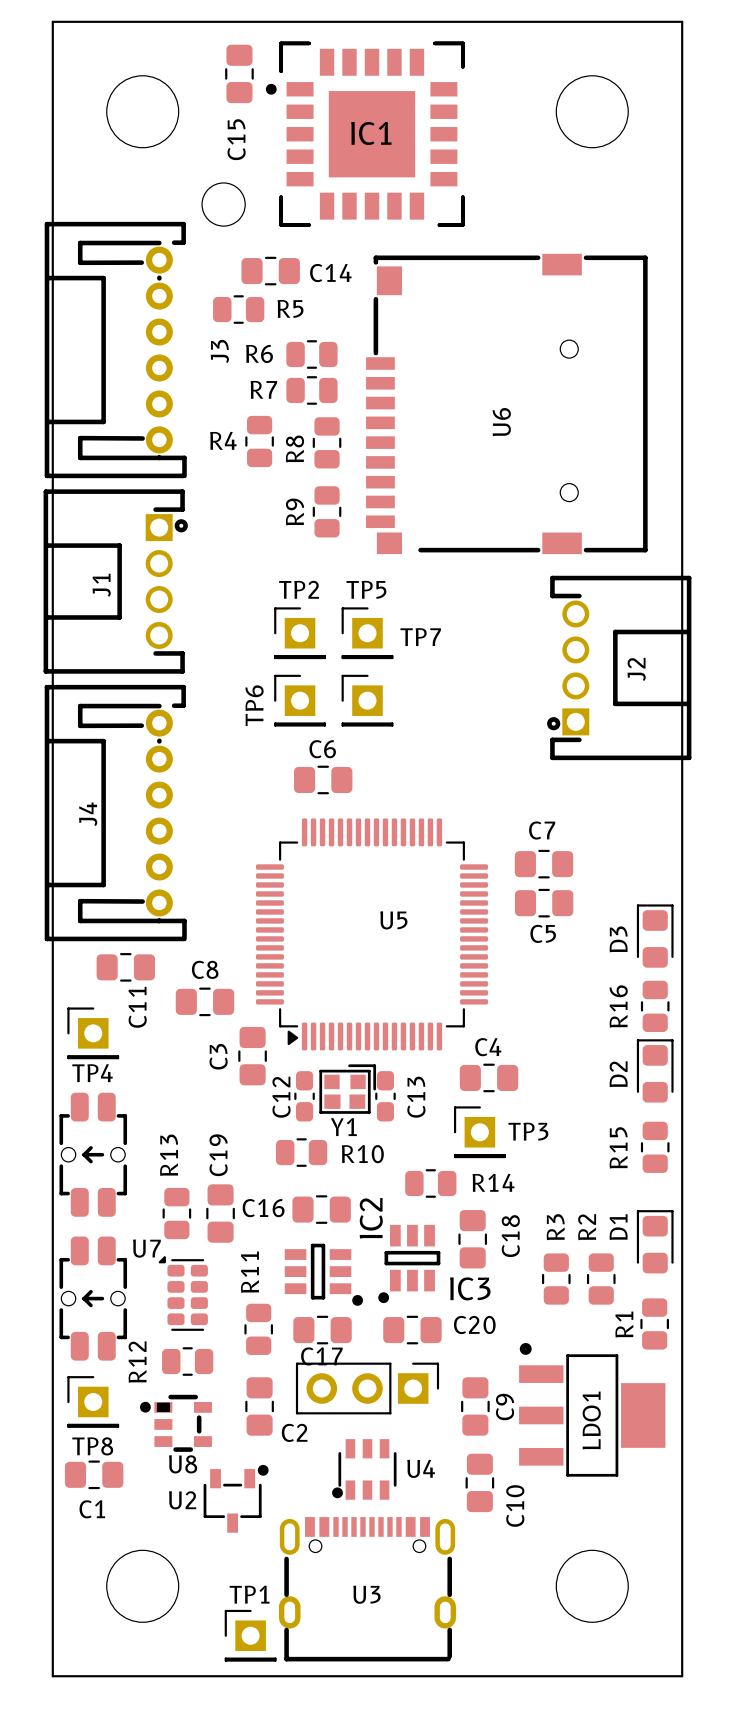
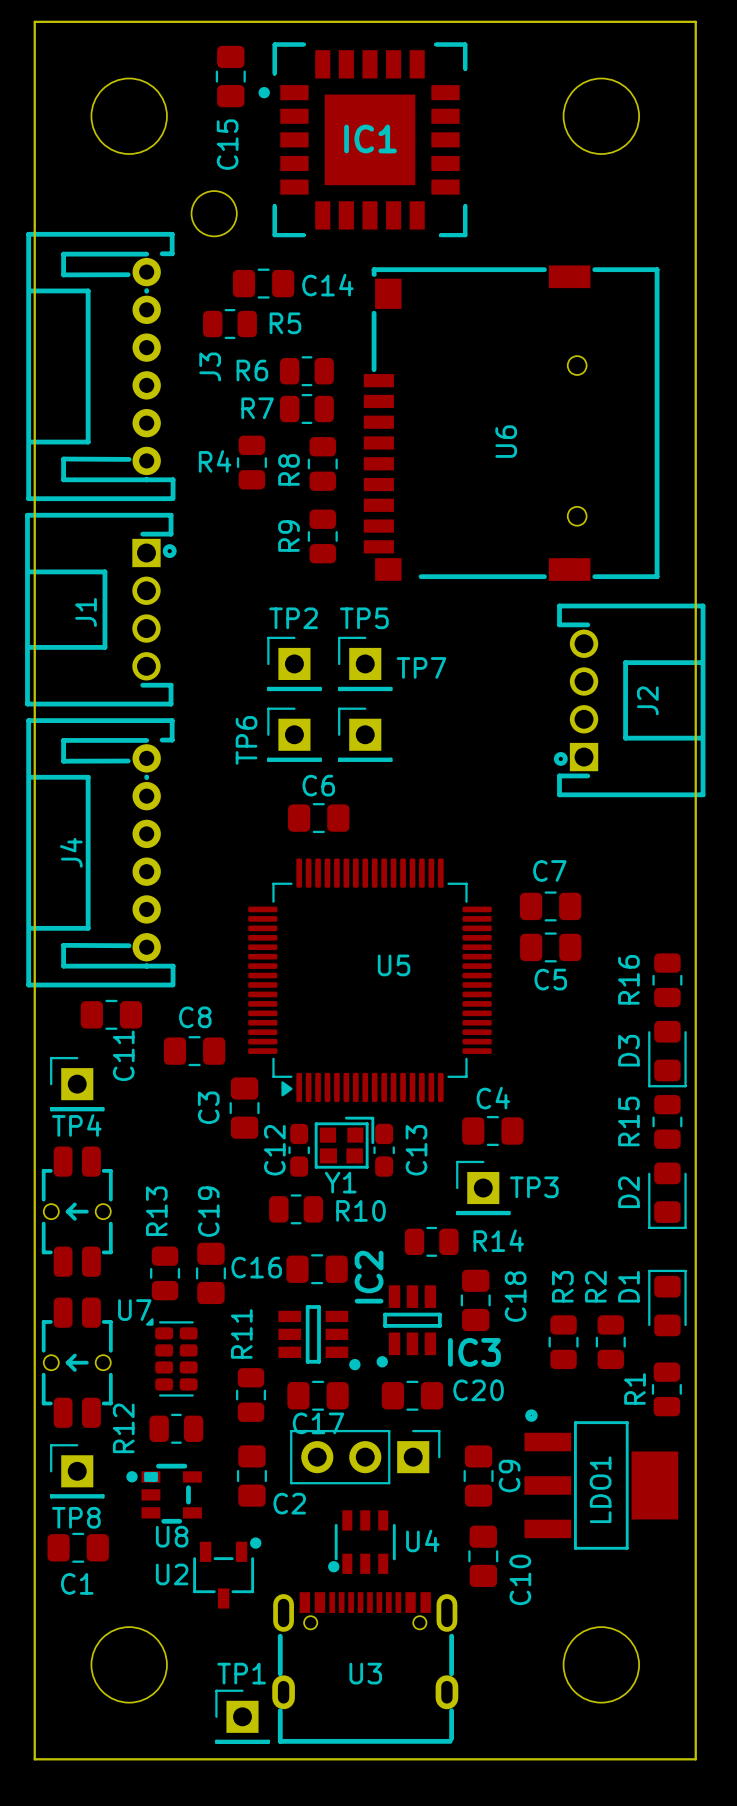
D3 rotation: 0° (655, 936) -> 180° (667, 1054)
D3 position: (655, 936) -> (667, 1054)
R16 position: (655, 1006) -> (667, 980)
D2 rotation: 0° (655, 1070) -> 180° (667, 1195)
D2 position: (655, 1070) -> (667, 1195)
R15 position: (655, 1147) -> (667, 1121)

